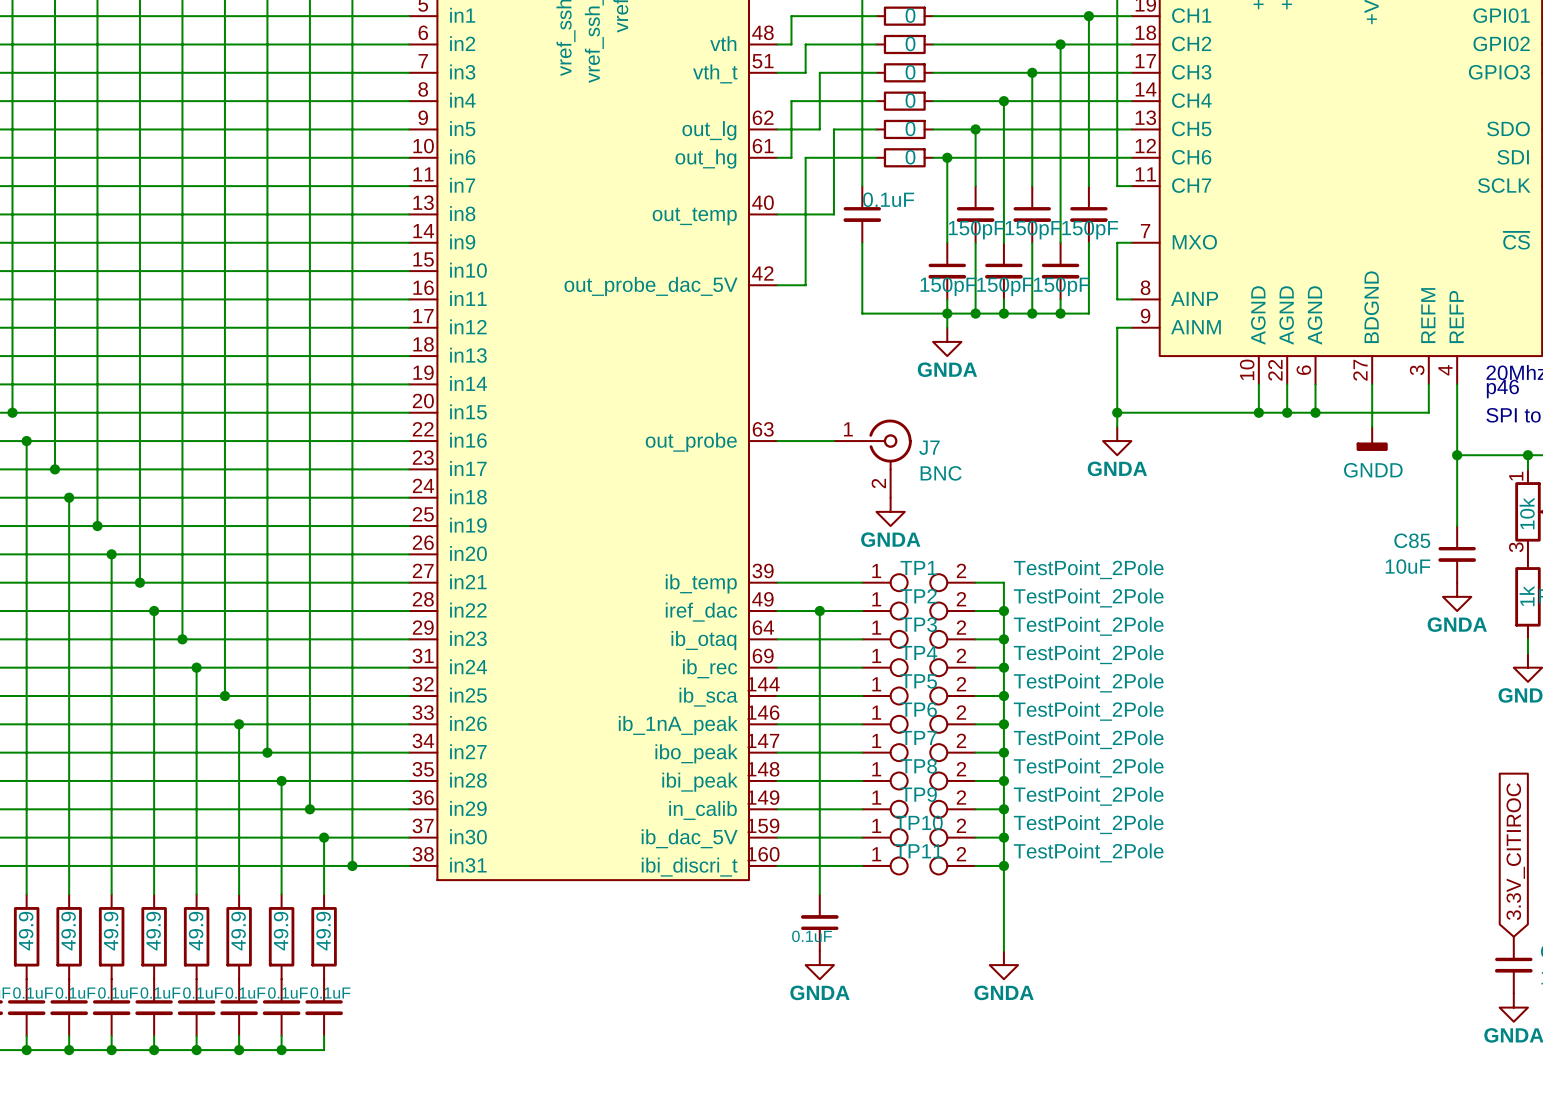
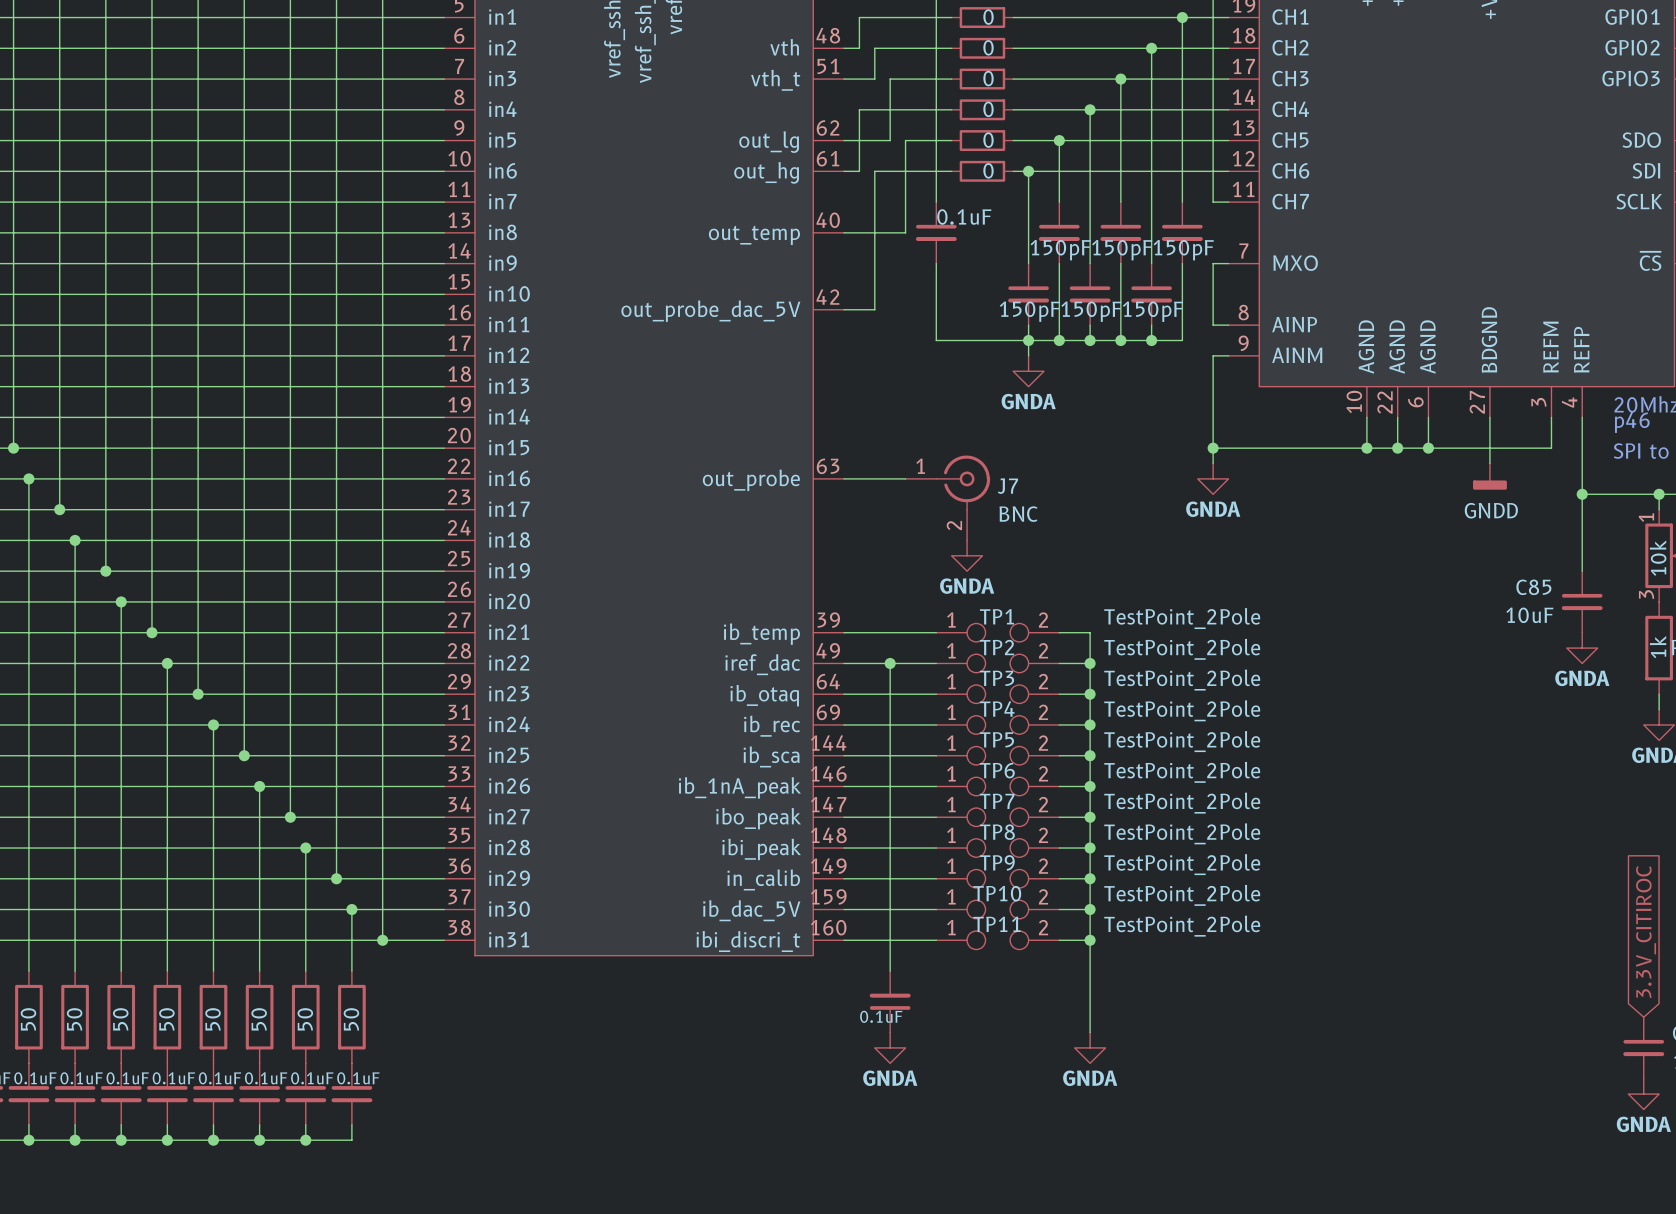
part value: 49.9 (26, 931) -> 50 (28, 1019)
part value: 49.9 (68, 931) -> 50 (74, 1019)
part value: 49.9 (111, 931) -> 50 (120, 1019)
part value: 49.9 (153, 931) -> 50 (166, 1019)
part value: 49.9 (196, 931) -> 50 (213, 1019)
part value: 49.9 (238, 931) -> 50 (259, 1019)
part value: 49.9 (281, 931) -> 50 (305, 1019)
part value: 49.9 (323, 931) -> 50 (351, 1019)

